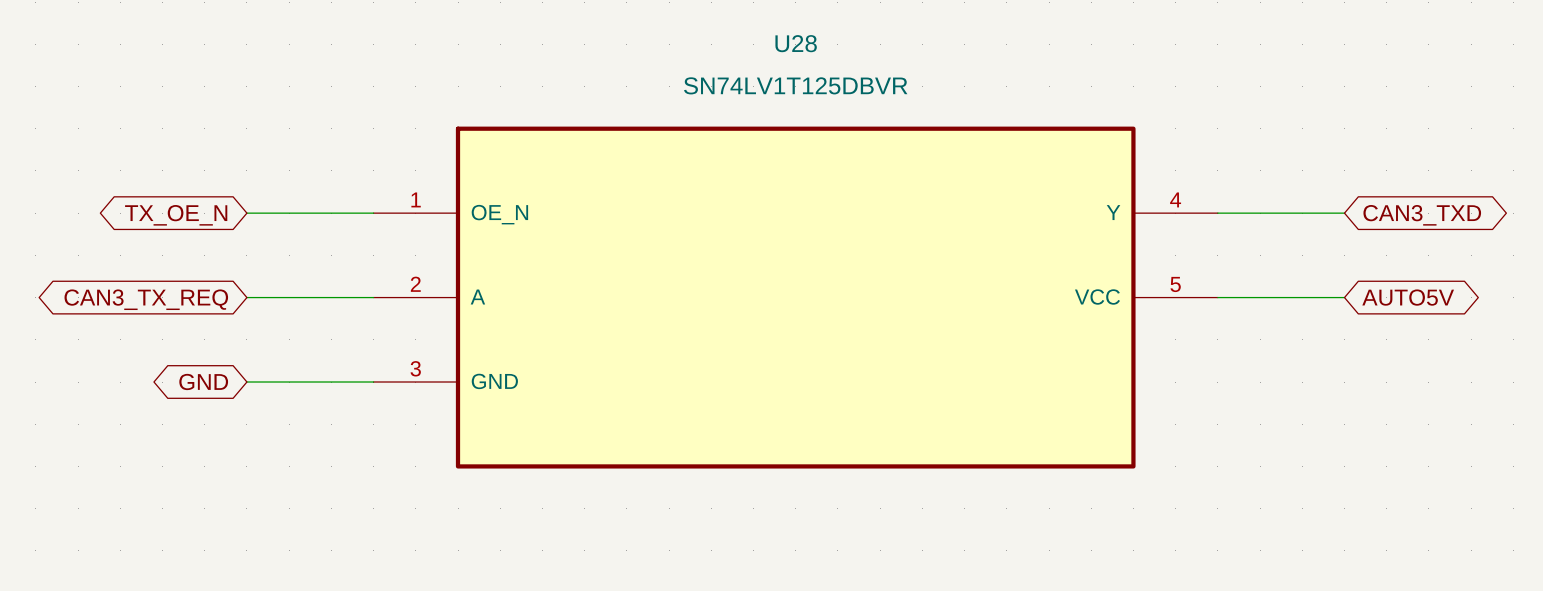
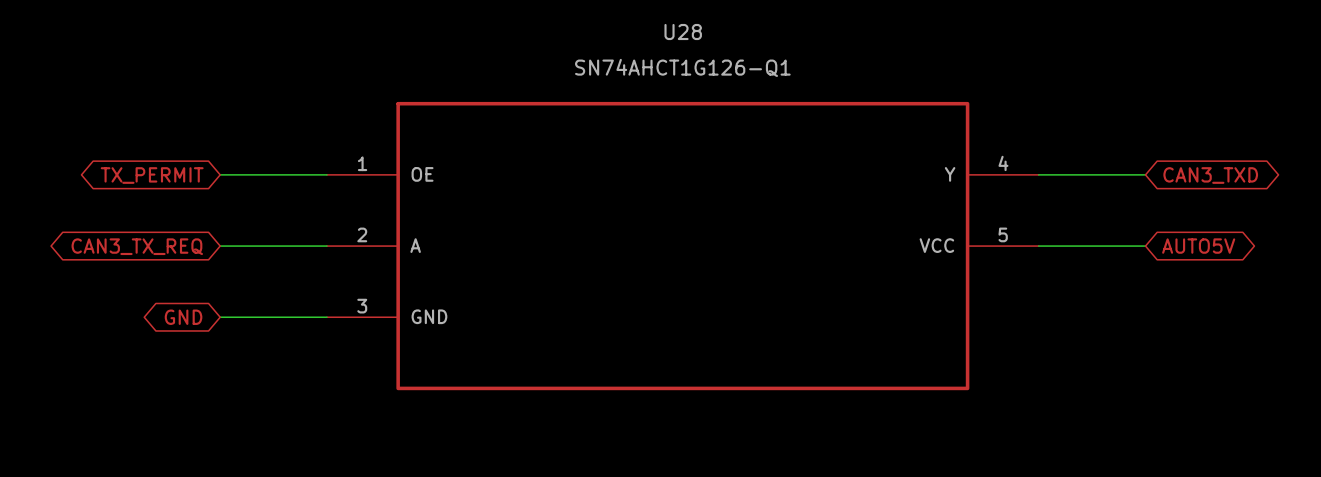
U28 value: SN74LV1T125DBVR (795, 85) -> SN74AHCT1G126-Q1 (682, 67)
U28 pin name: OE_N (499, 214) -> OE (422, 174)
global label: TX_OE_N (176, 215) -> TX_PERMIT (152, 175)

